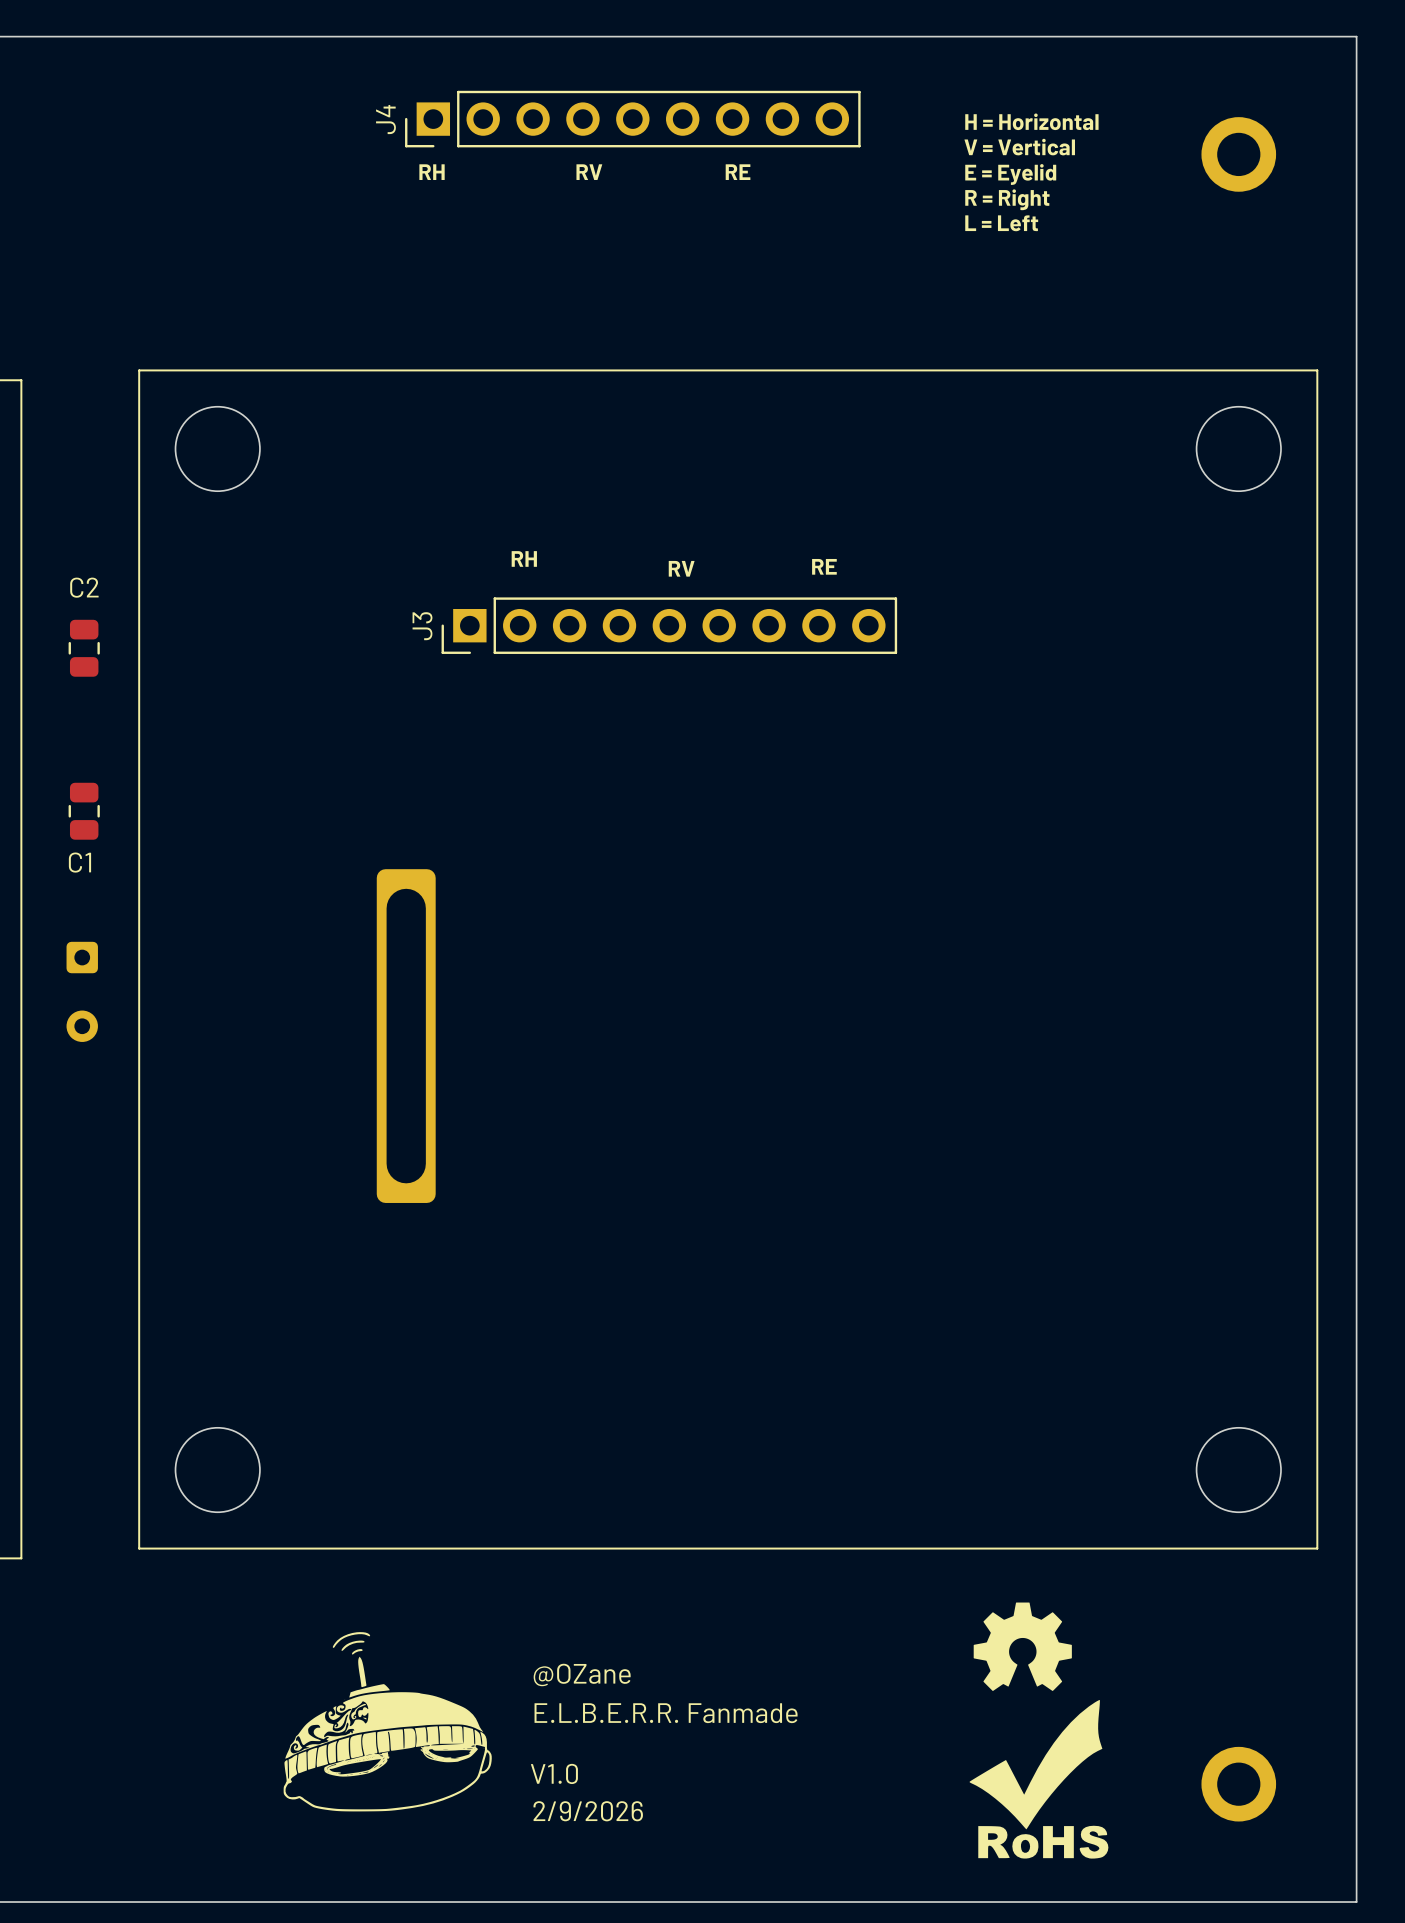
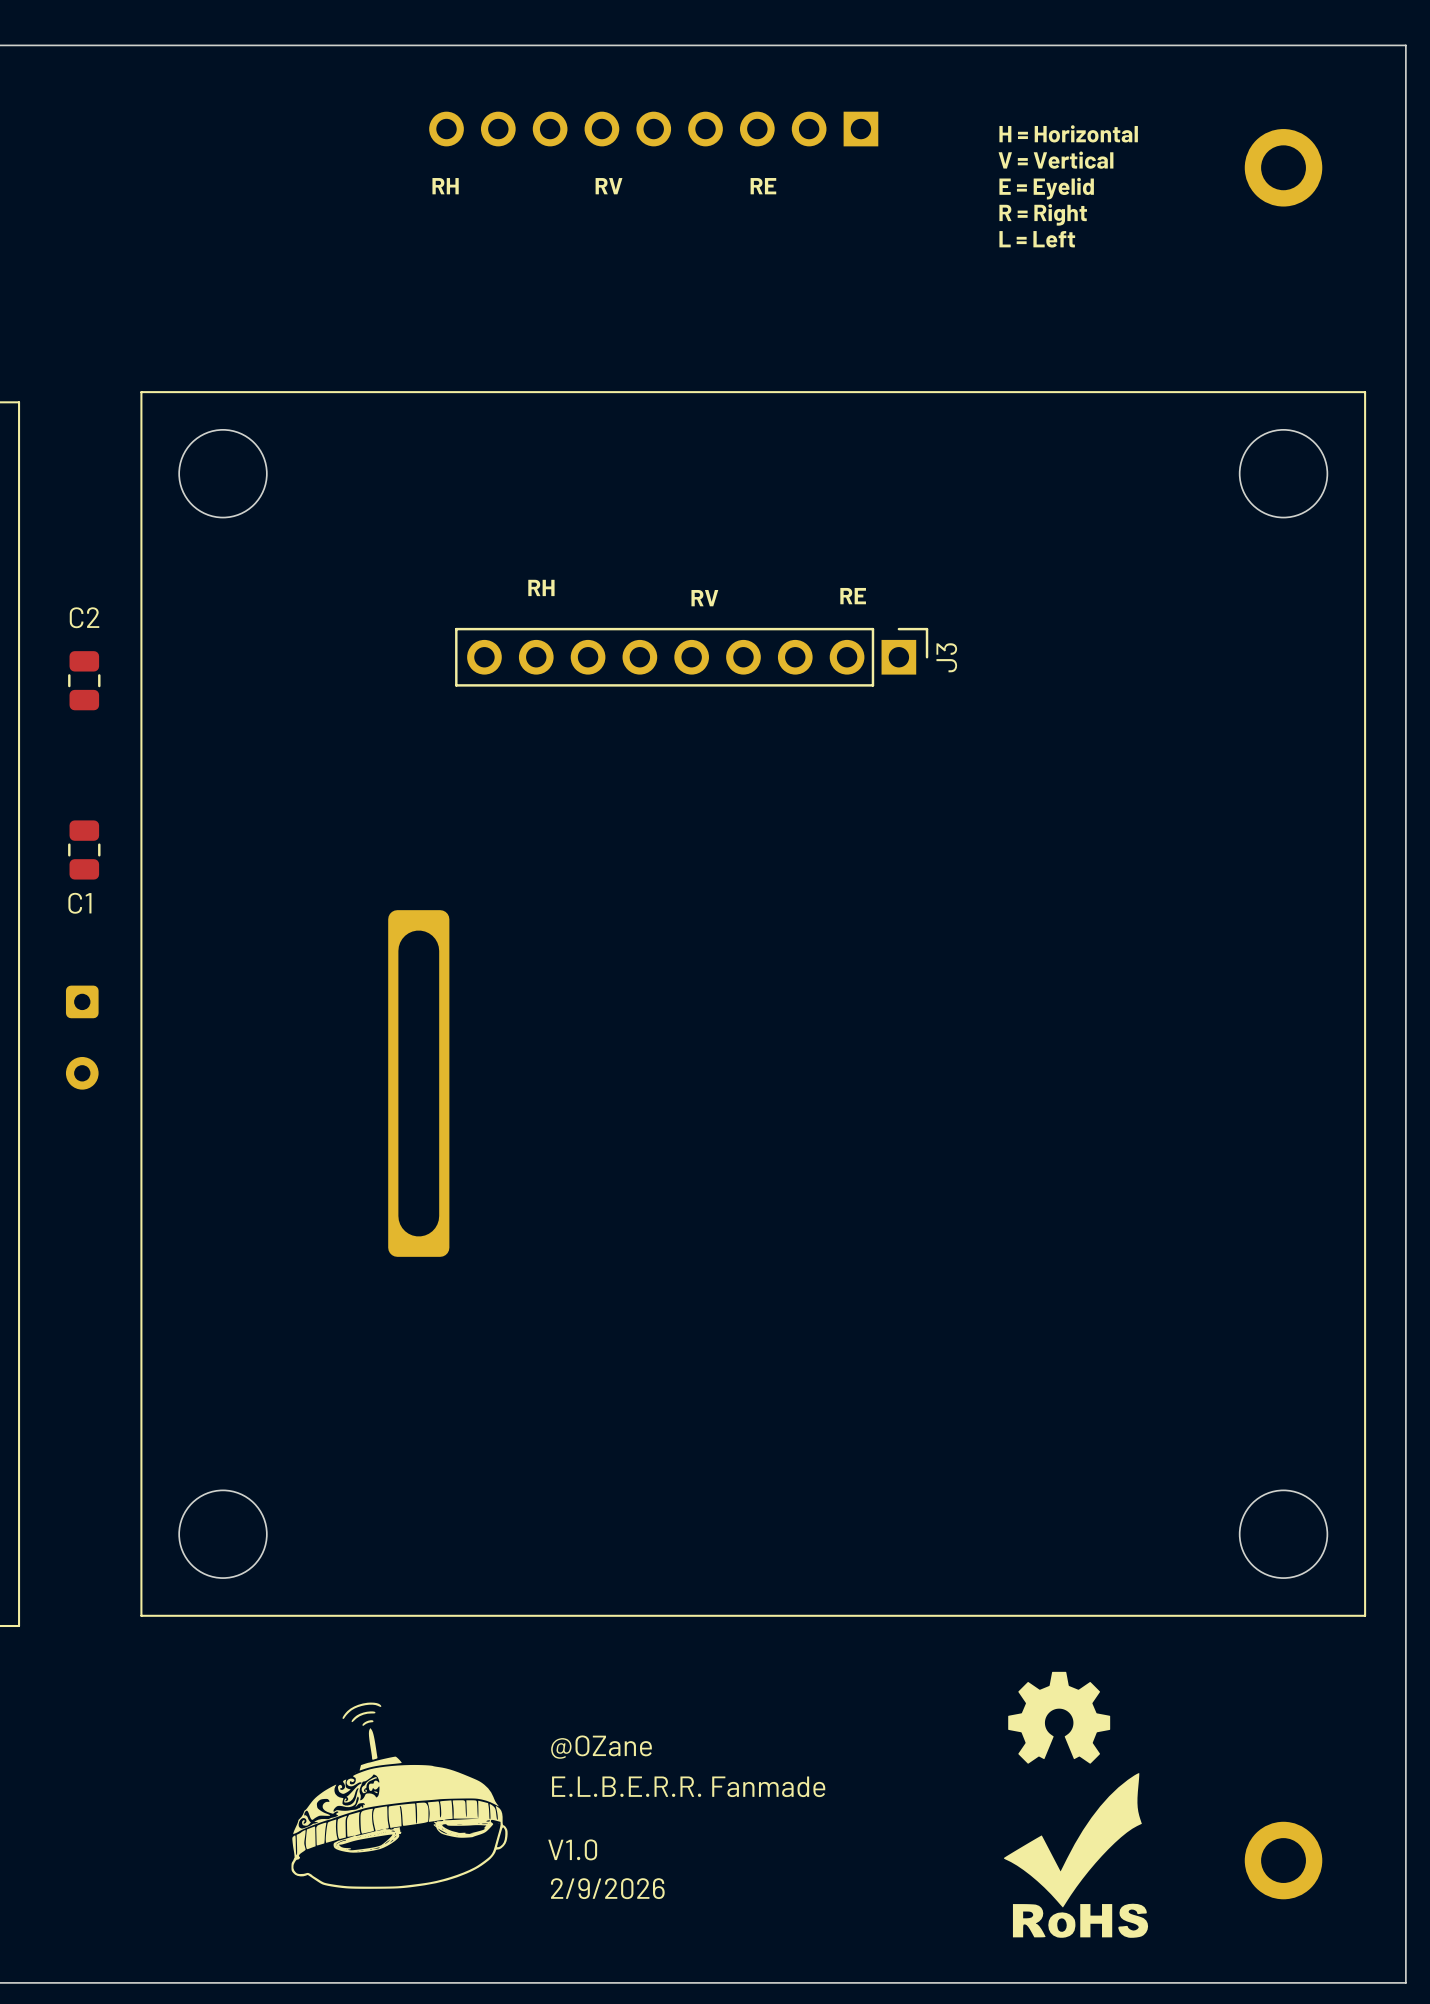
J4 side: top (632, 119) -> bottom (653, 129)
J3 rotation: 0° (669, 625) -> 180° (691, 657)

